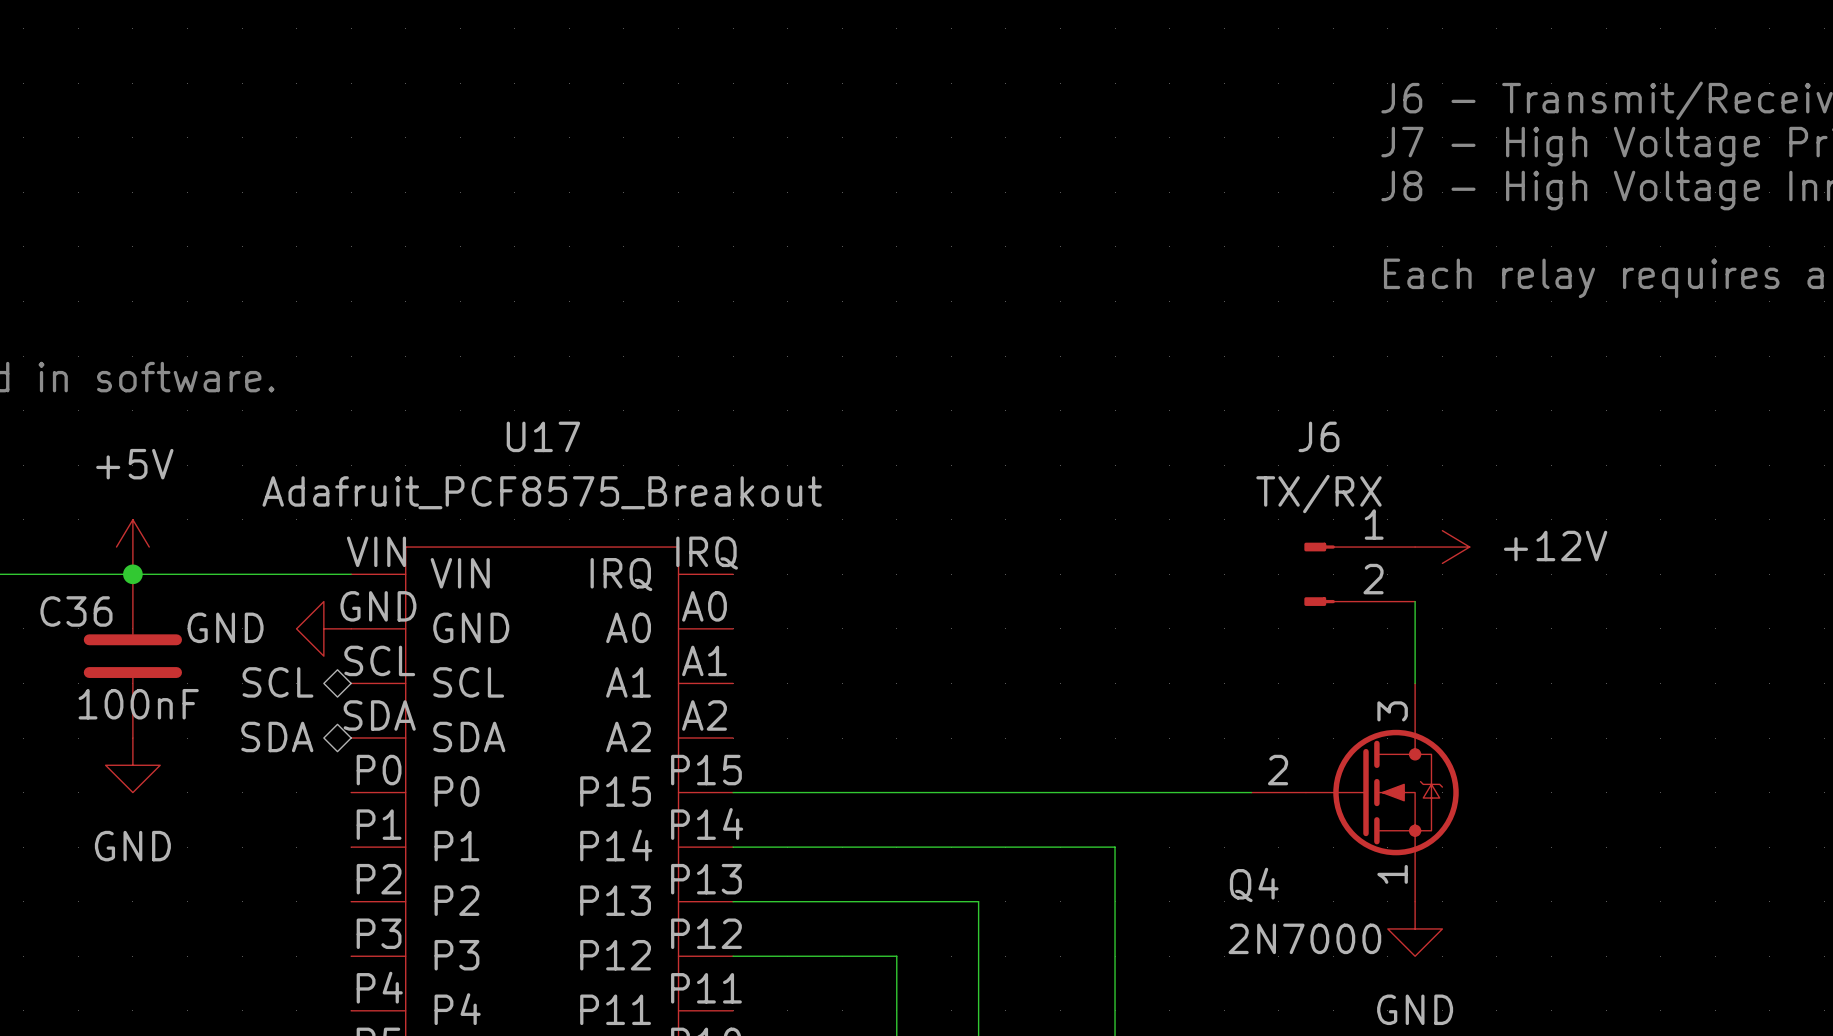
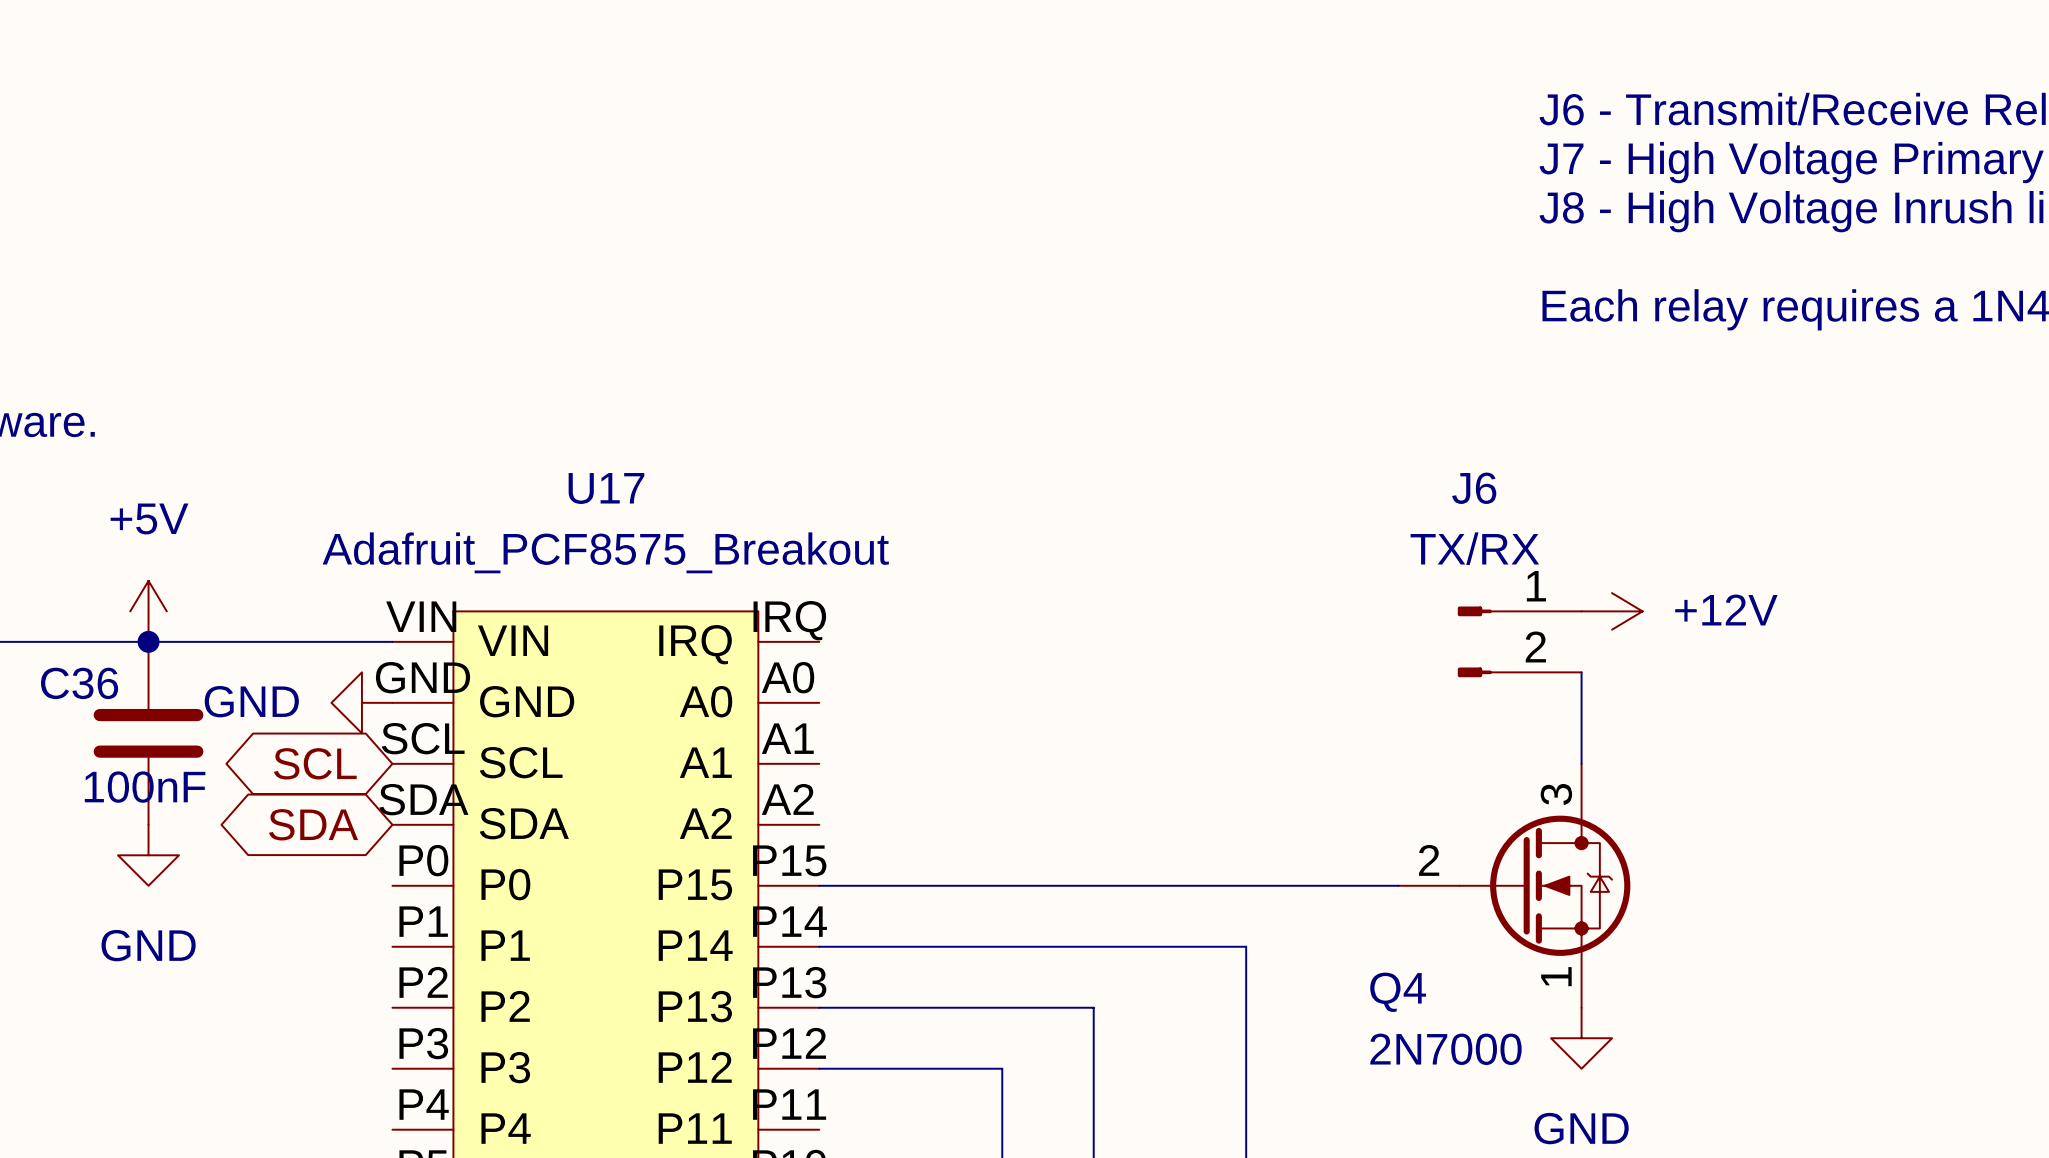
hierarchical label: SCL (277, 682) -> none
global label: none -> SCL (315, 763)
hierarchical label: SDA (277, 736) -> none
global label: none -> SDA (313, 824)

